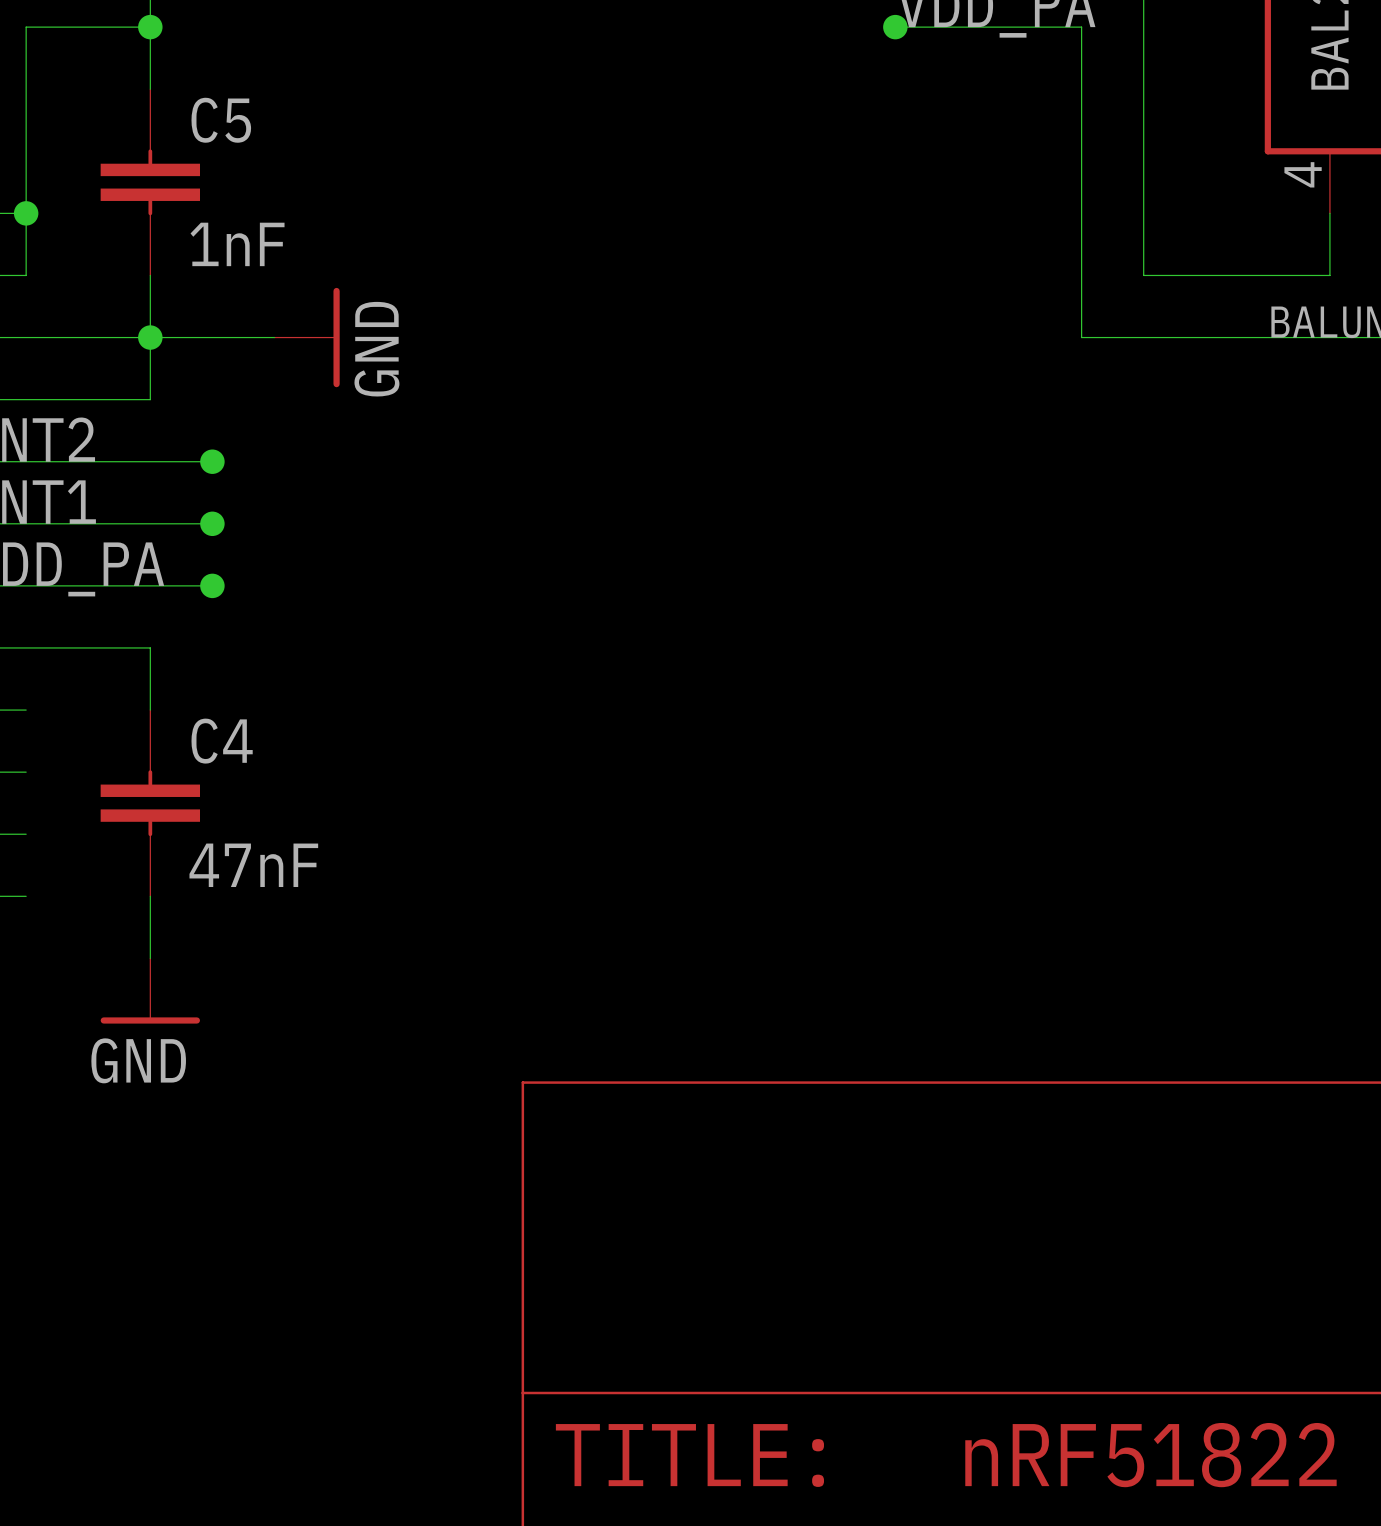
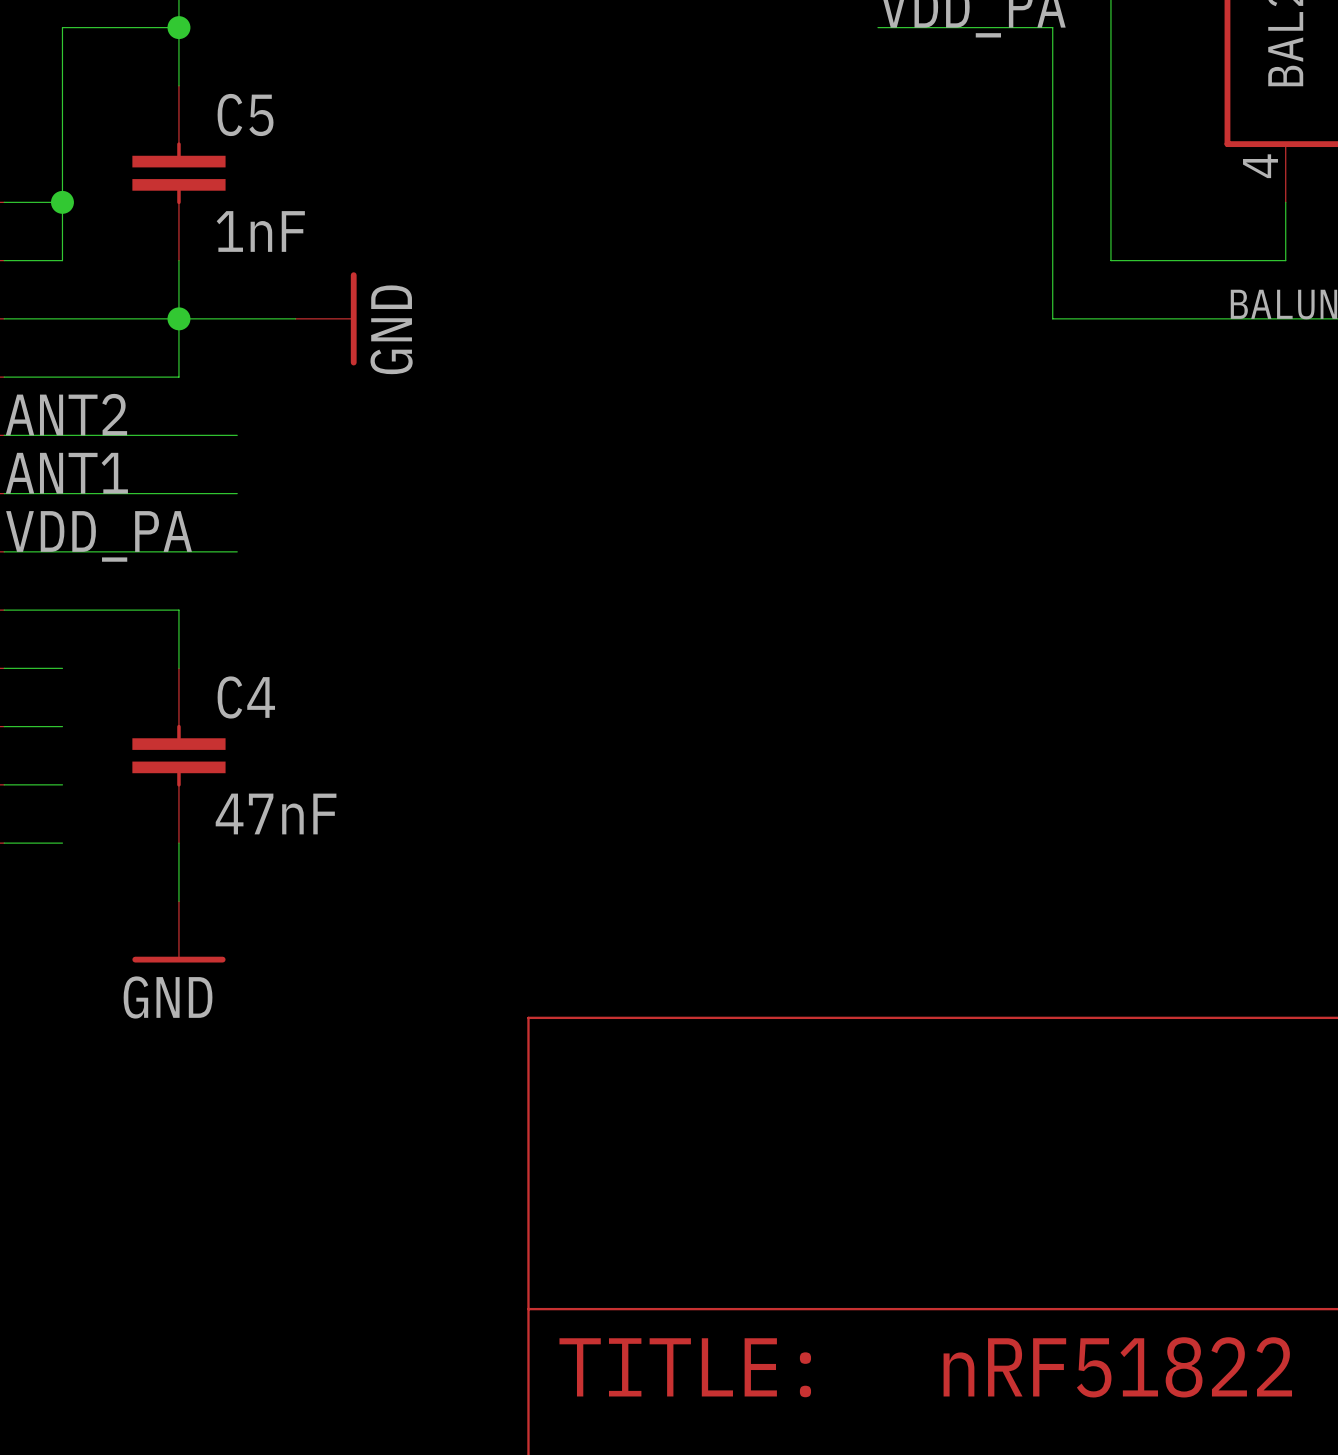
junction: (895, 27) -> none
junction: (212, 461) -> none
junction: (212, 523) -> none
junction: (212, 585) -> none

